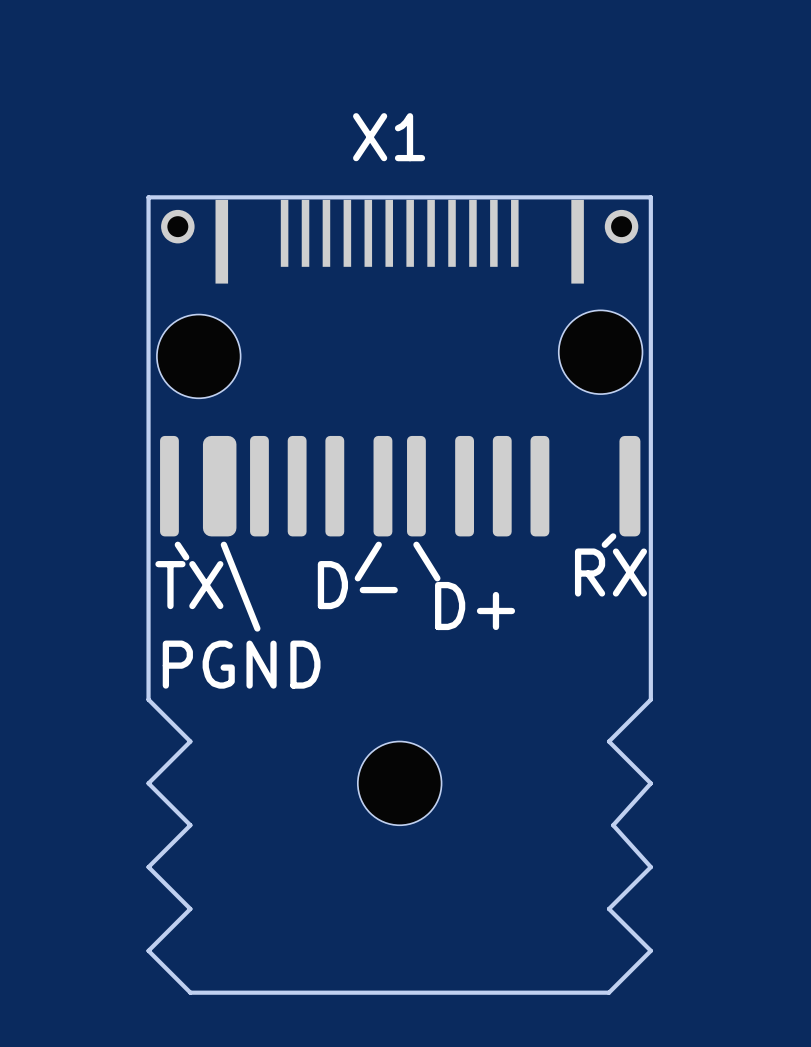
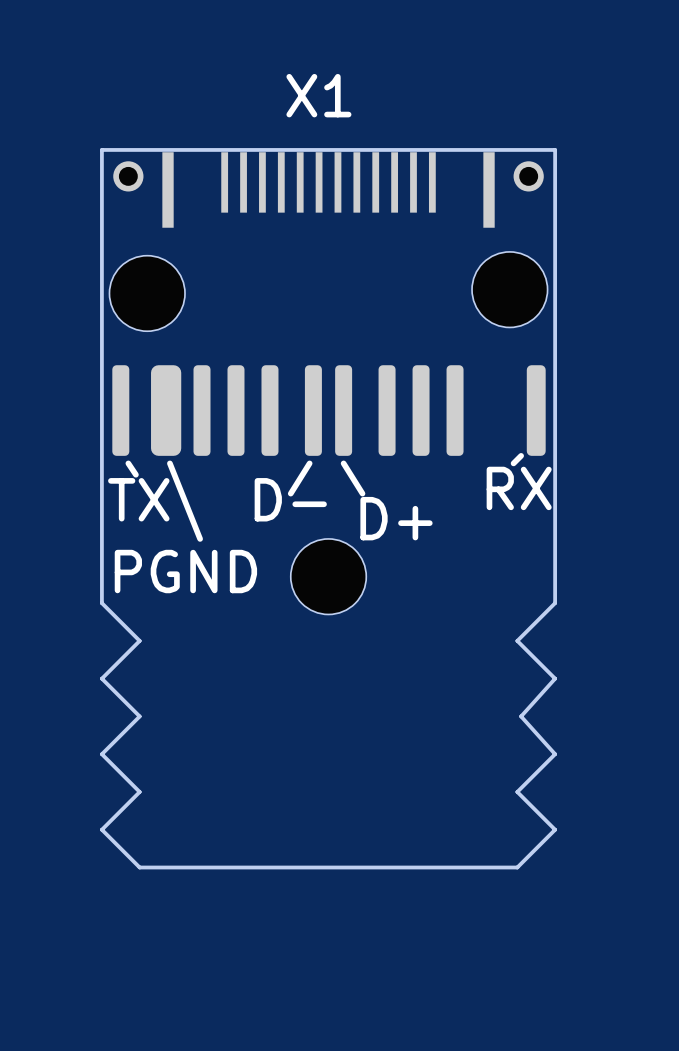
part position: (399, 783) -> (328, 576)

